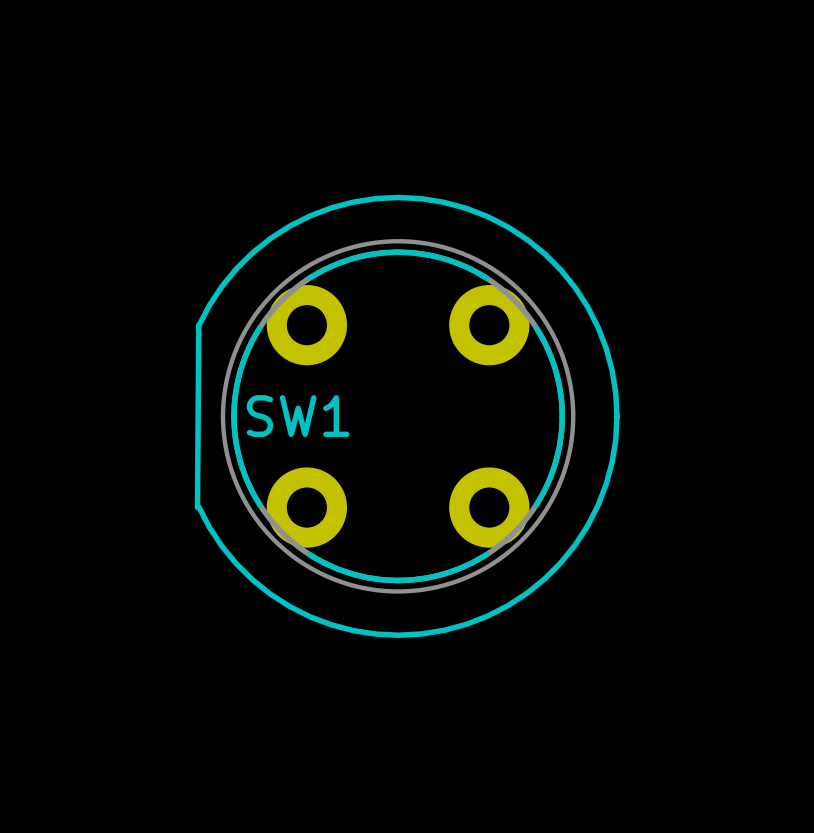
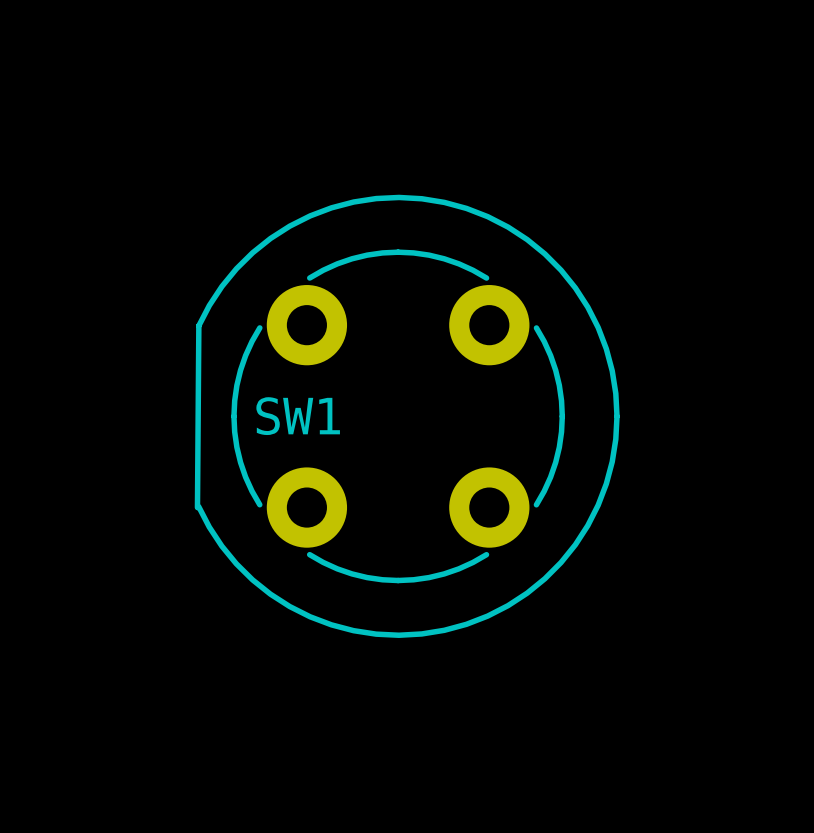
SW1 footprint: [194, 194, 620, 638] -> [194, 194, 620, 638]
drawing: [220, 239, 576, 594] -> none

